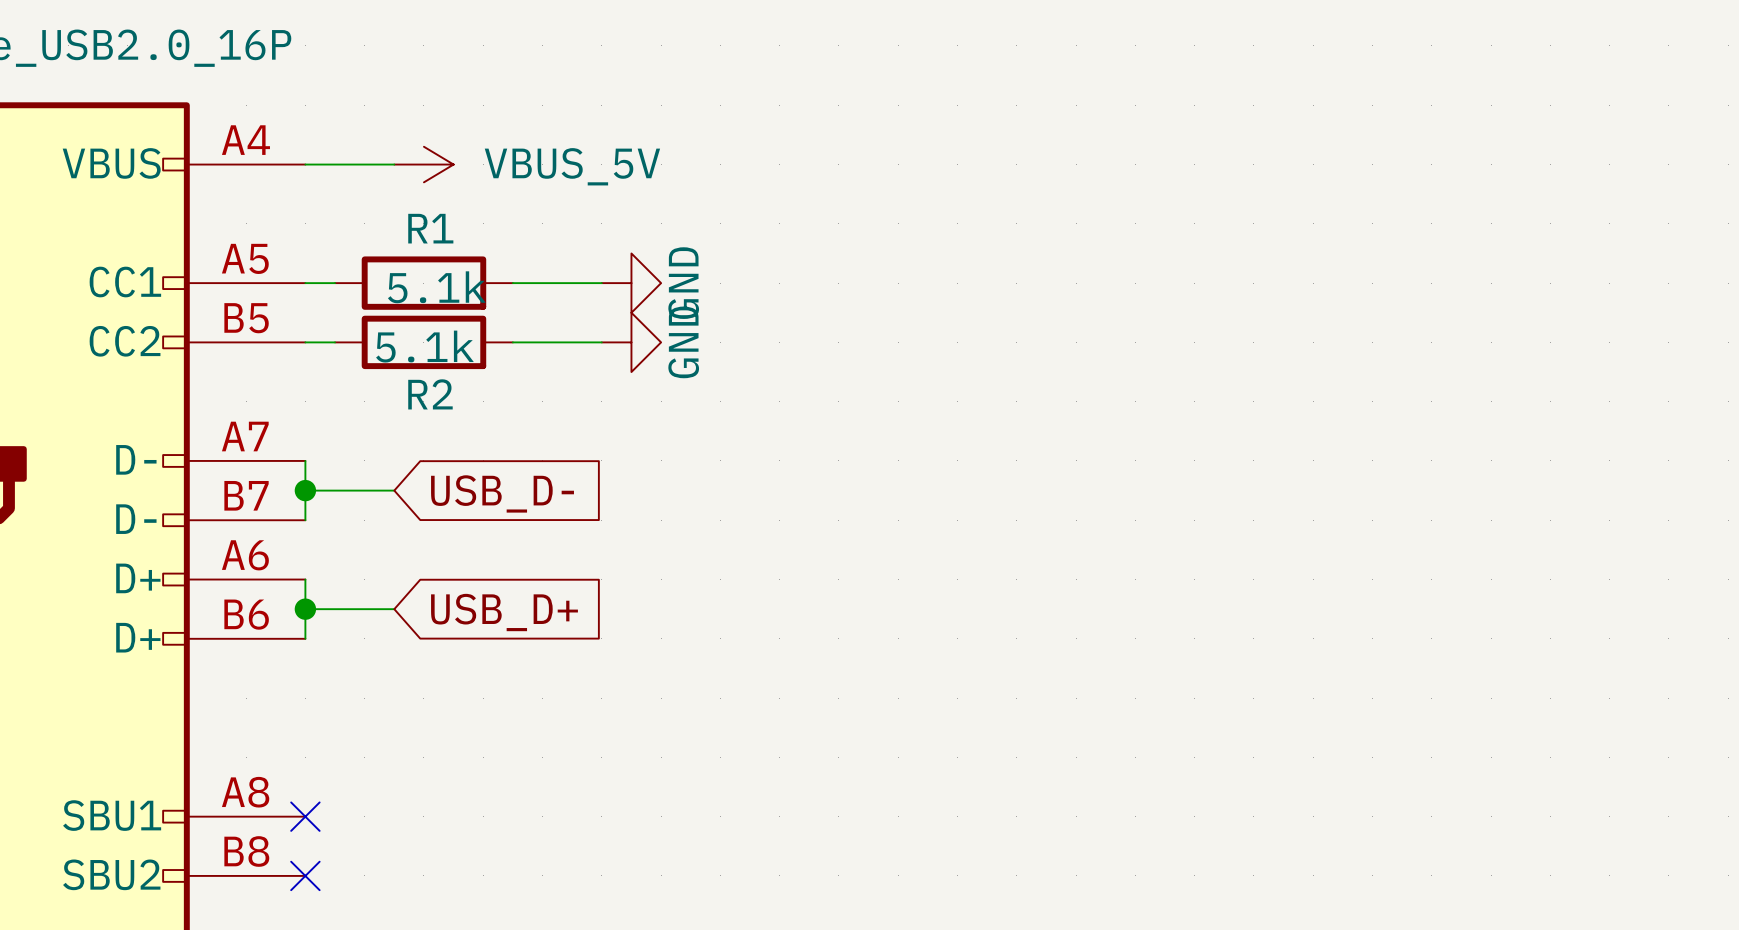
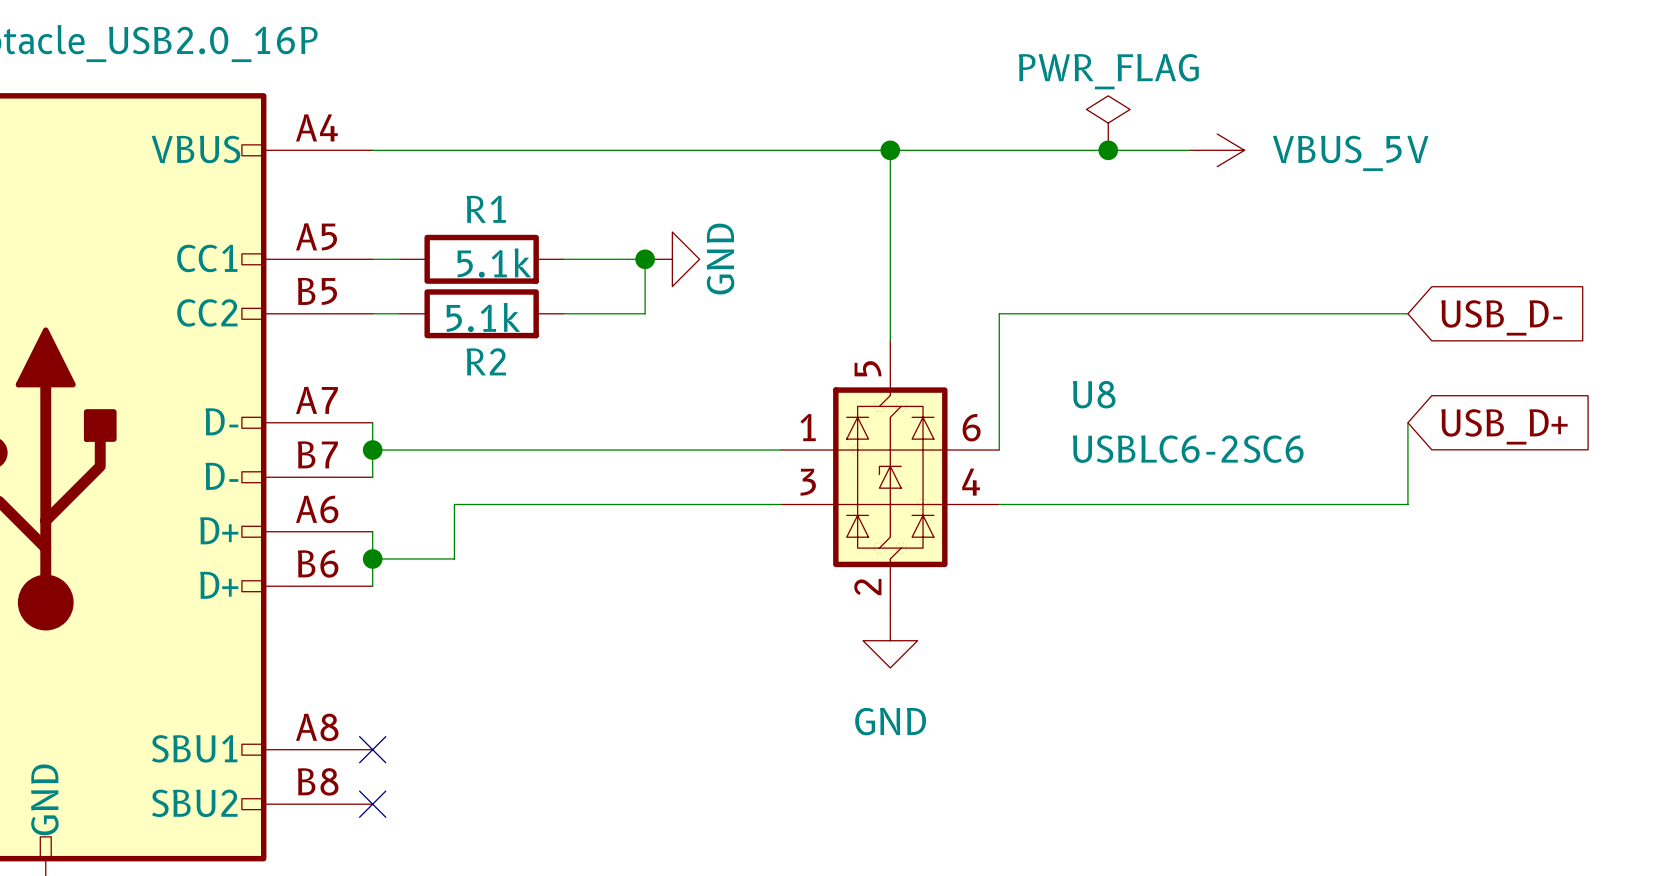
power symbol: none -> PWR_FLAG (1108, 123)
wire: none -> (454, 150) (1190, 150)
power symbol: VBUS_5V (423, 164) -> none
wire: none -> (890, 150) (890, 341)
junction: none -> (890, 150)
junction: none -> (1108, 150)
power symbol: none -> VBUS_5V (1217, 150)
wire: none -> (645, 259) (645, 313)
junction: none -> (645, 259)
power symbol rotation: 0° (631, 342) -> 90° clockwise (890, 640)
power symbol position: GND (631, 342) -> GND (890, 640)
wire: none -> (1407, 313) (999, 313) (999, 450)
global label: none -> USB_D- (1501, 317)
wire: none -> (1407, 422) (1407, 504) (999, 504)
global label: none -> USB_D+ (1504, 426)
wire: none -> (454, 450) (781, 450)
global label: USB_D- (502, 493) -> none
U8: none -> USBLC6-2SC6 (890, 477)
wire: none -> (781, 504) (454, 504) (454, 558)
global label: USB_D+ (504, 612) -> none

